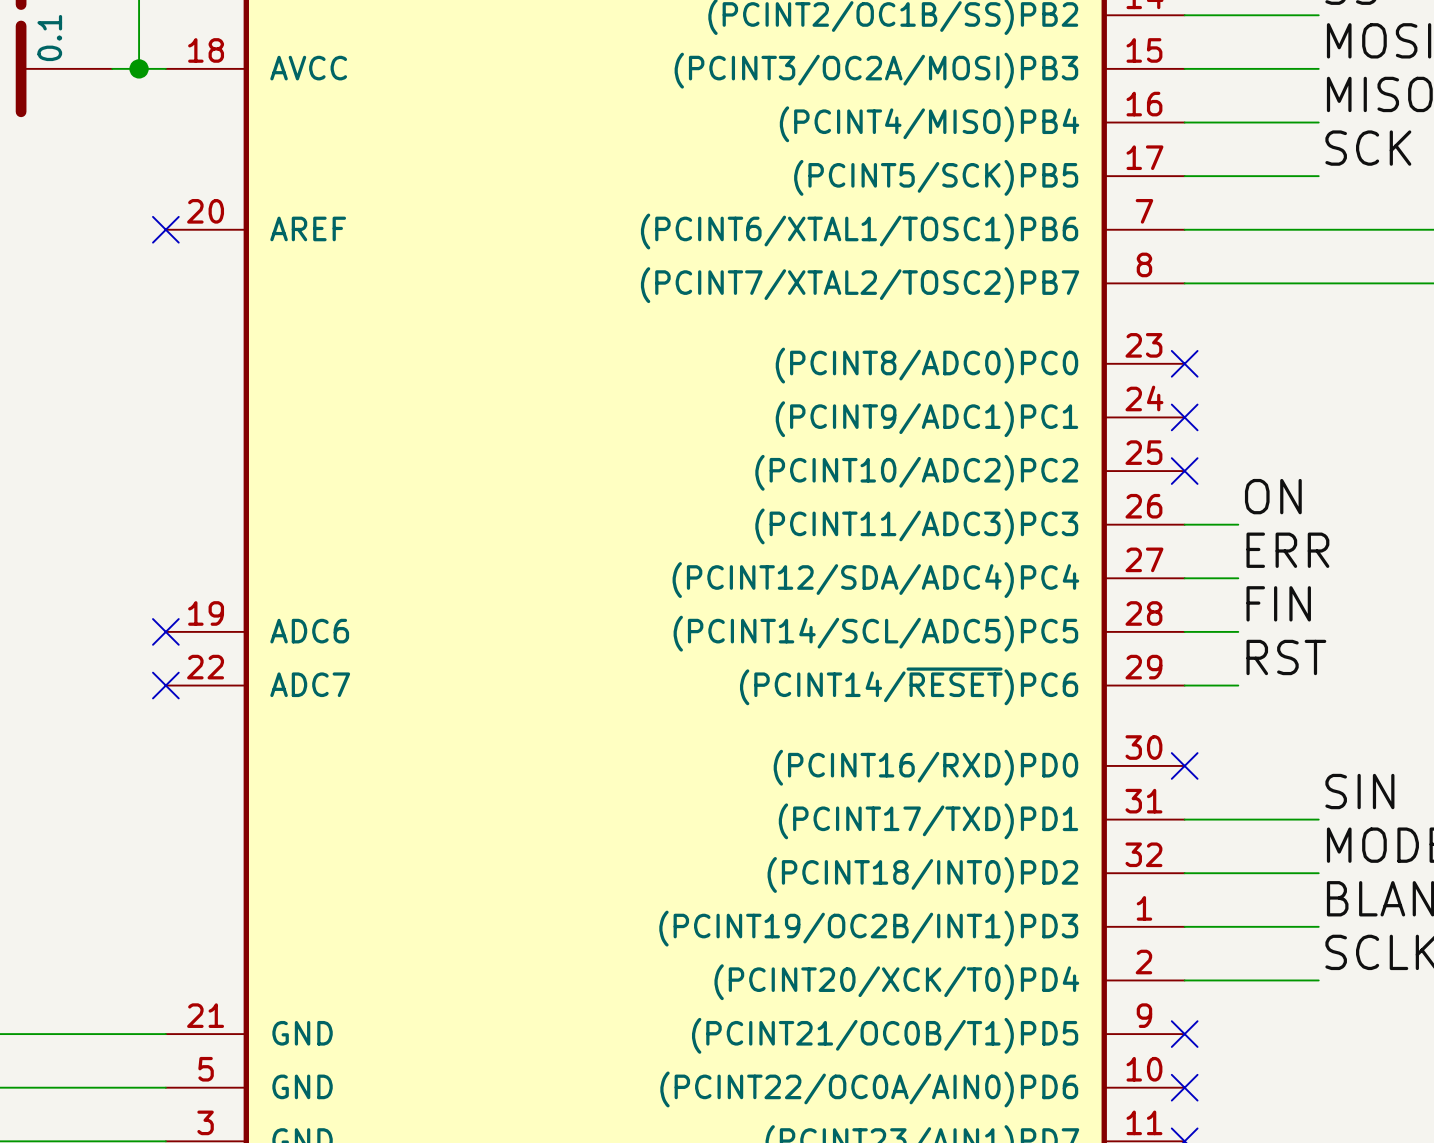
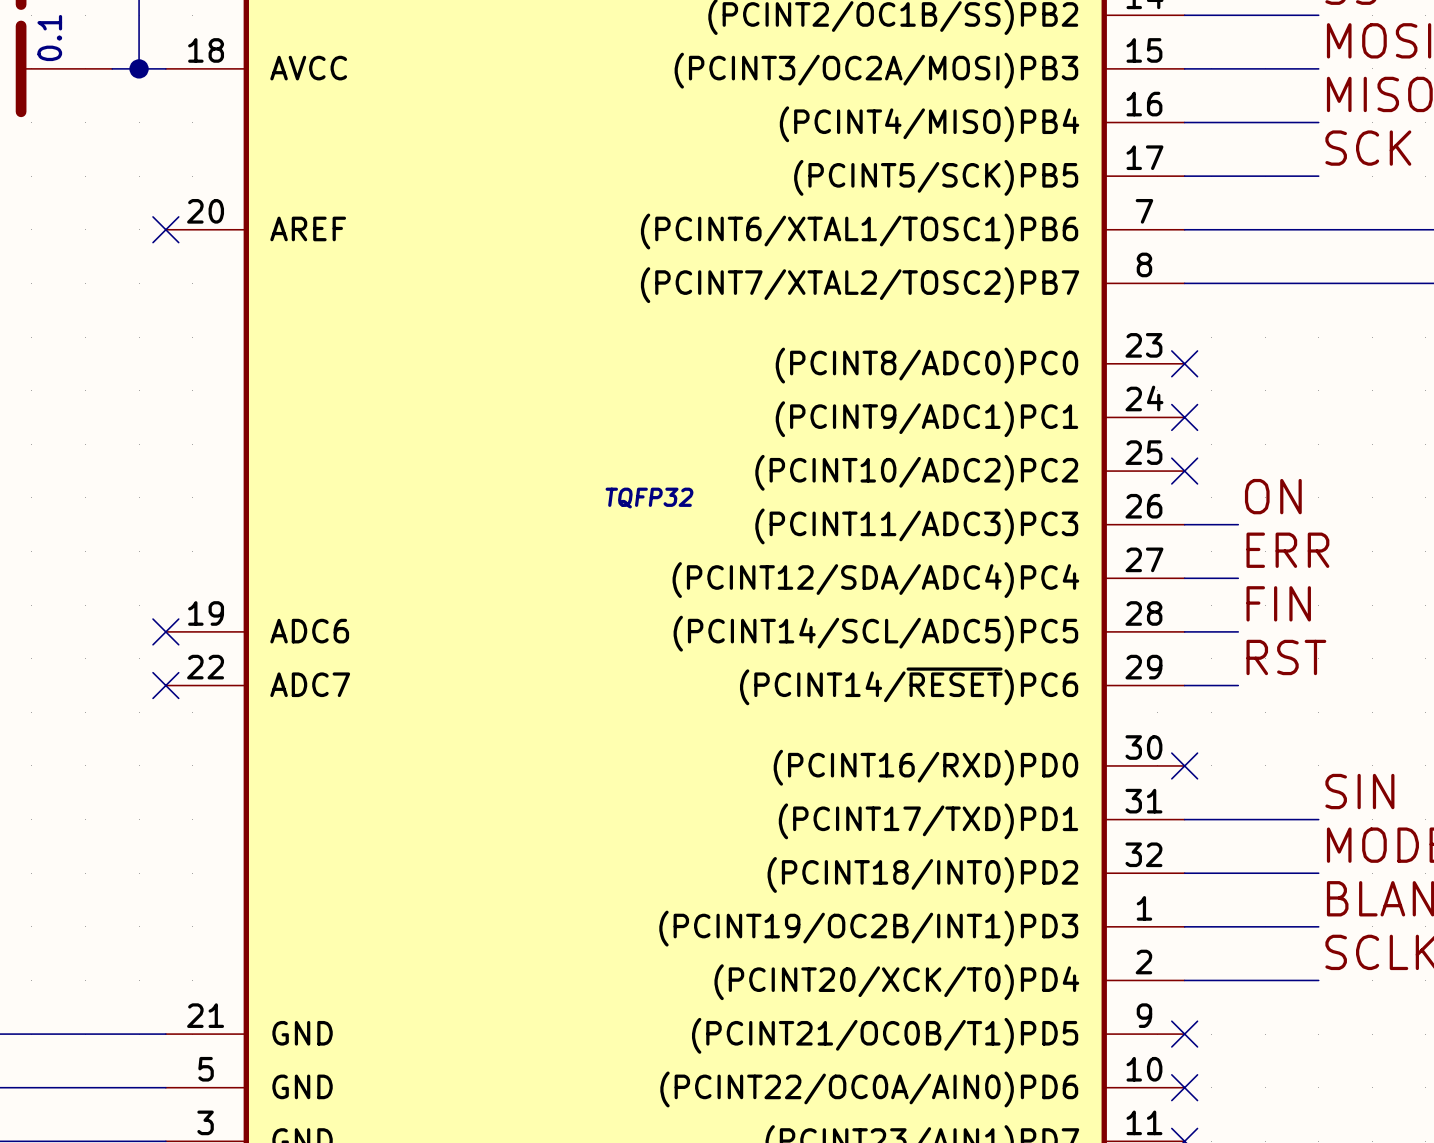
part text: none -> TQFP32 (649, 498)

